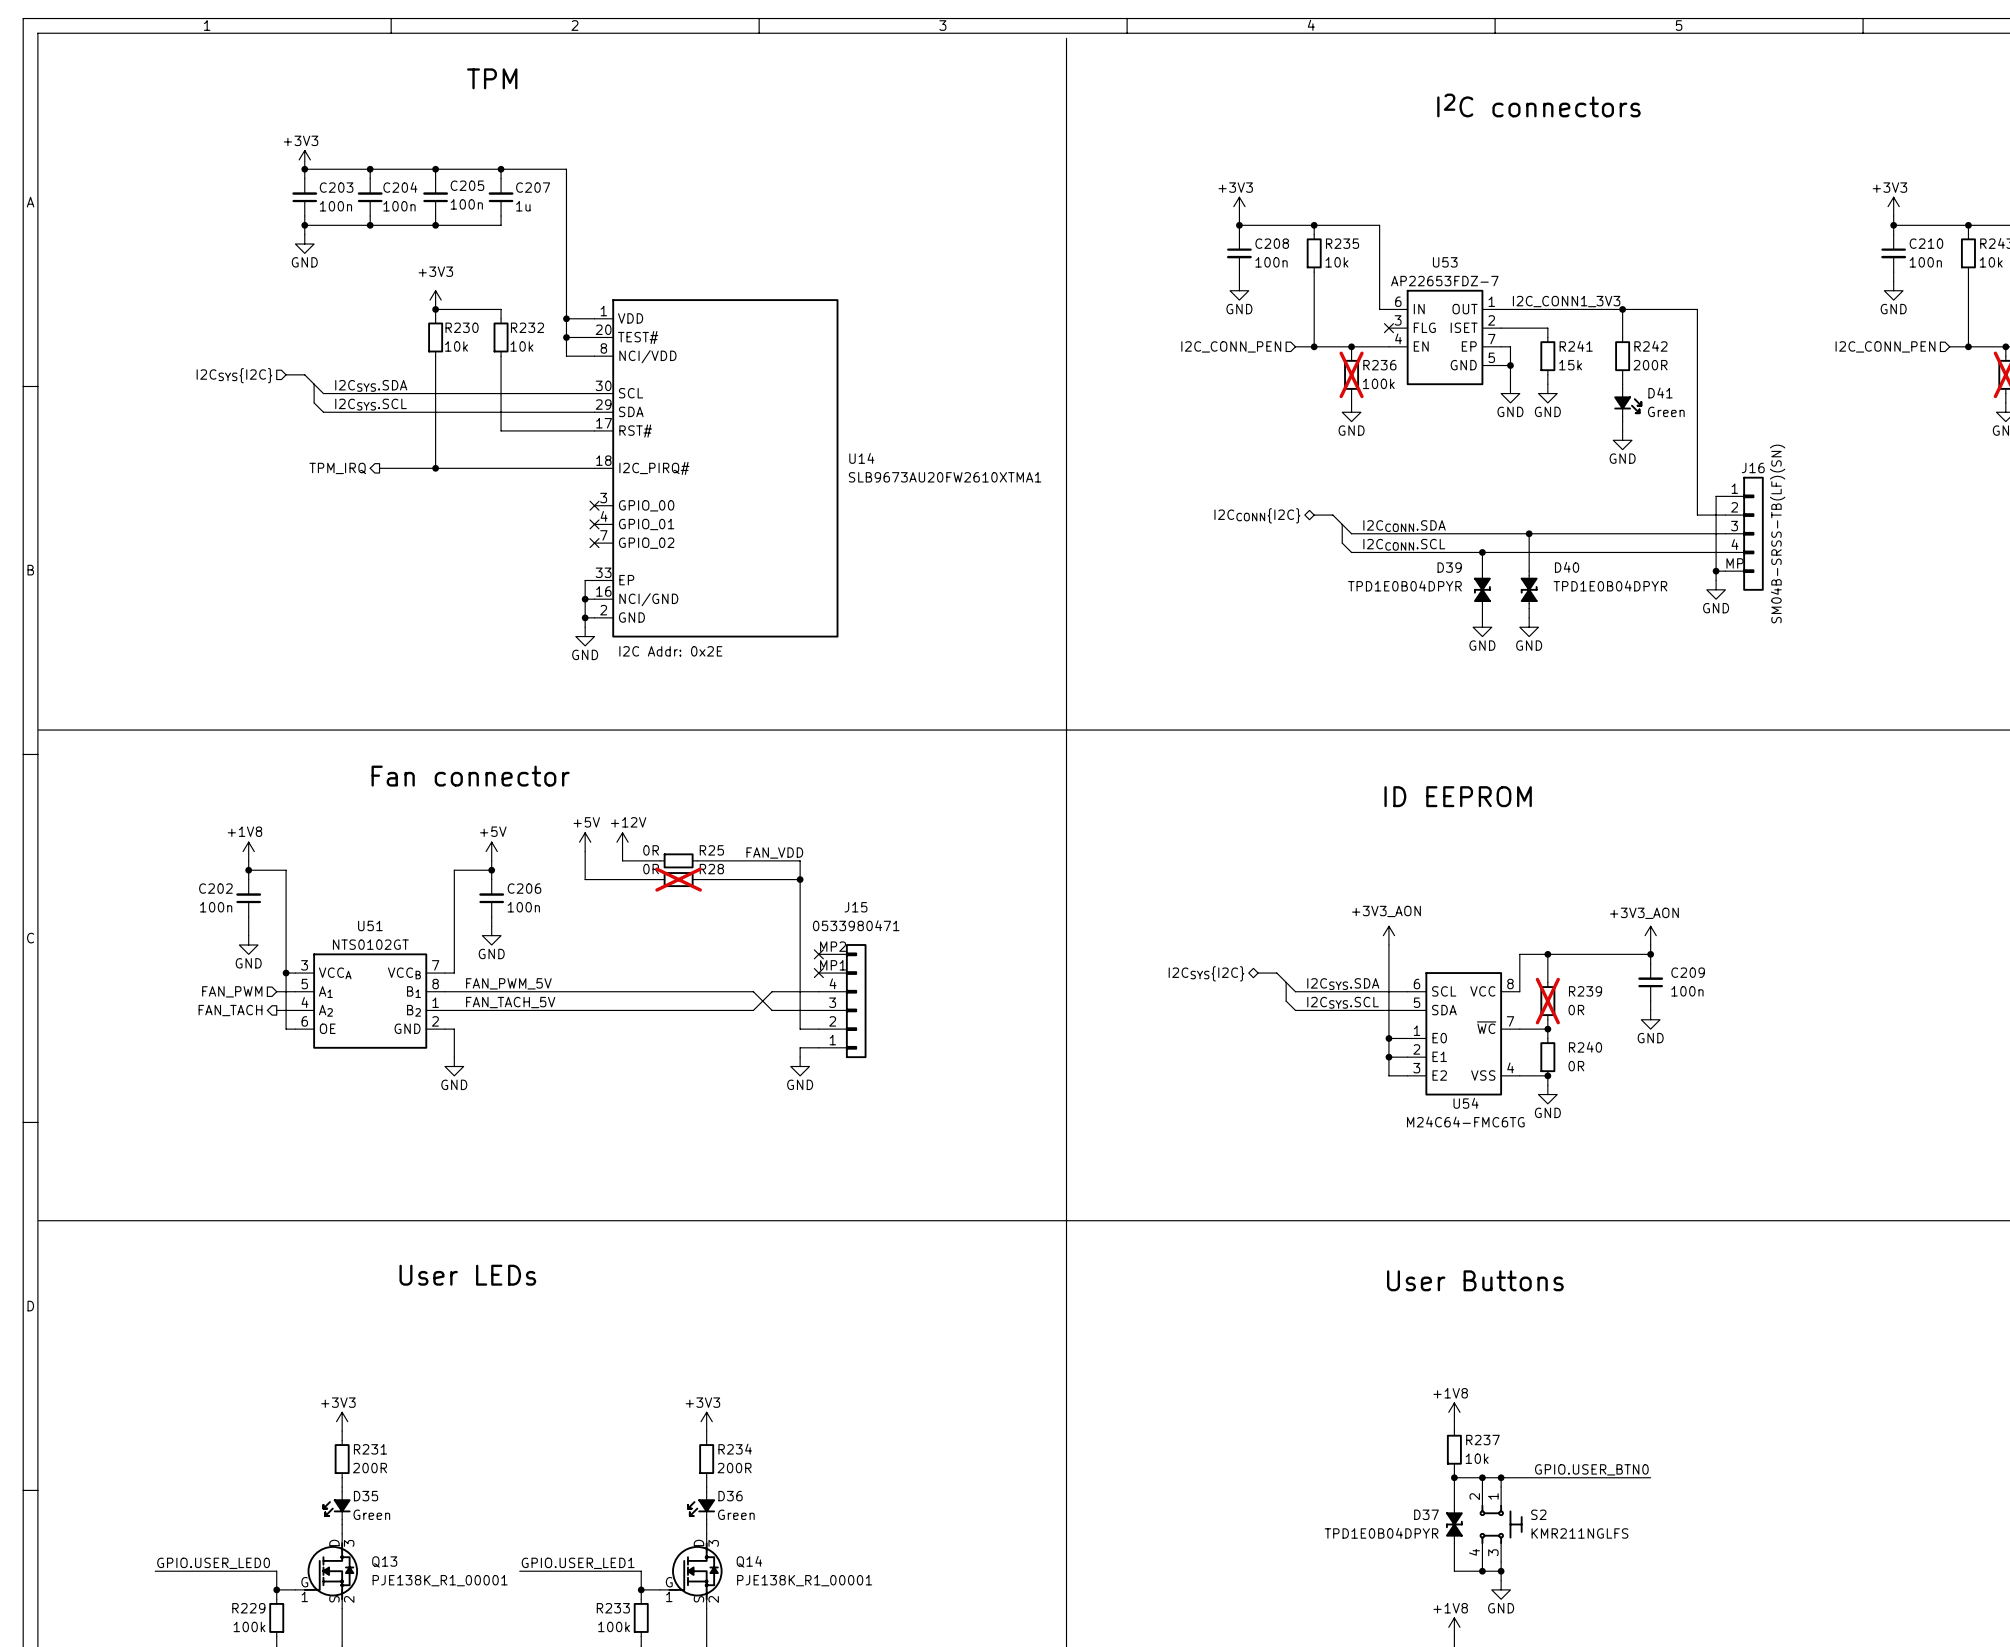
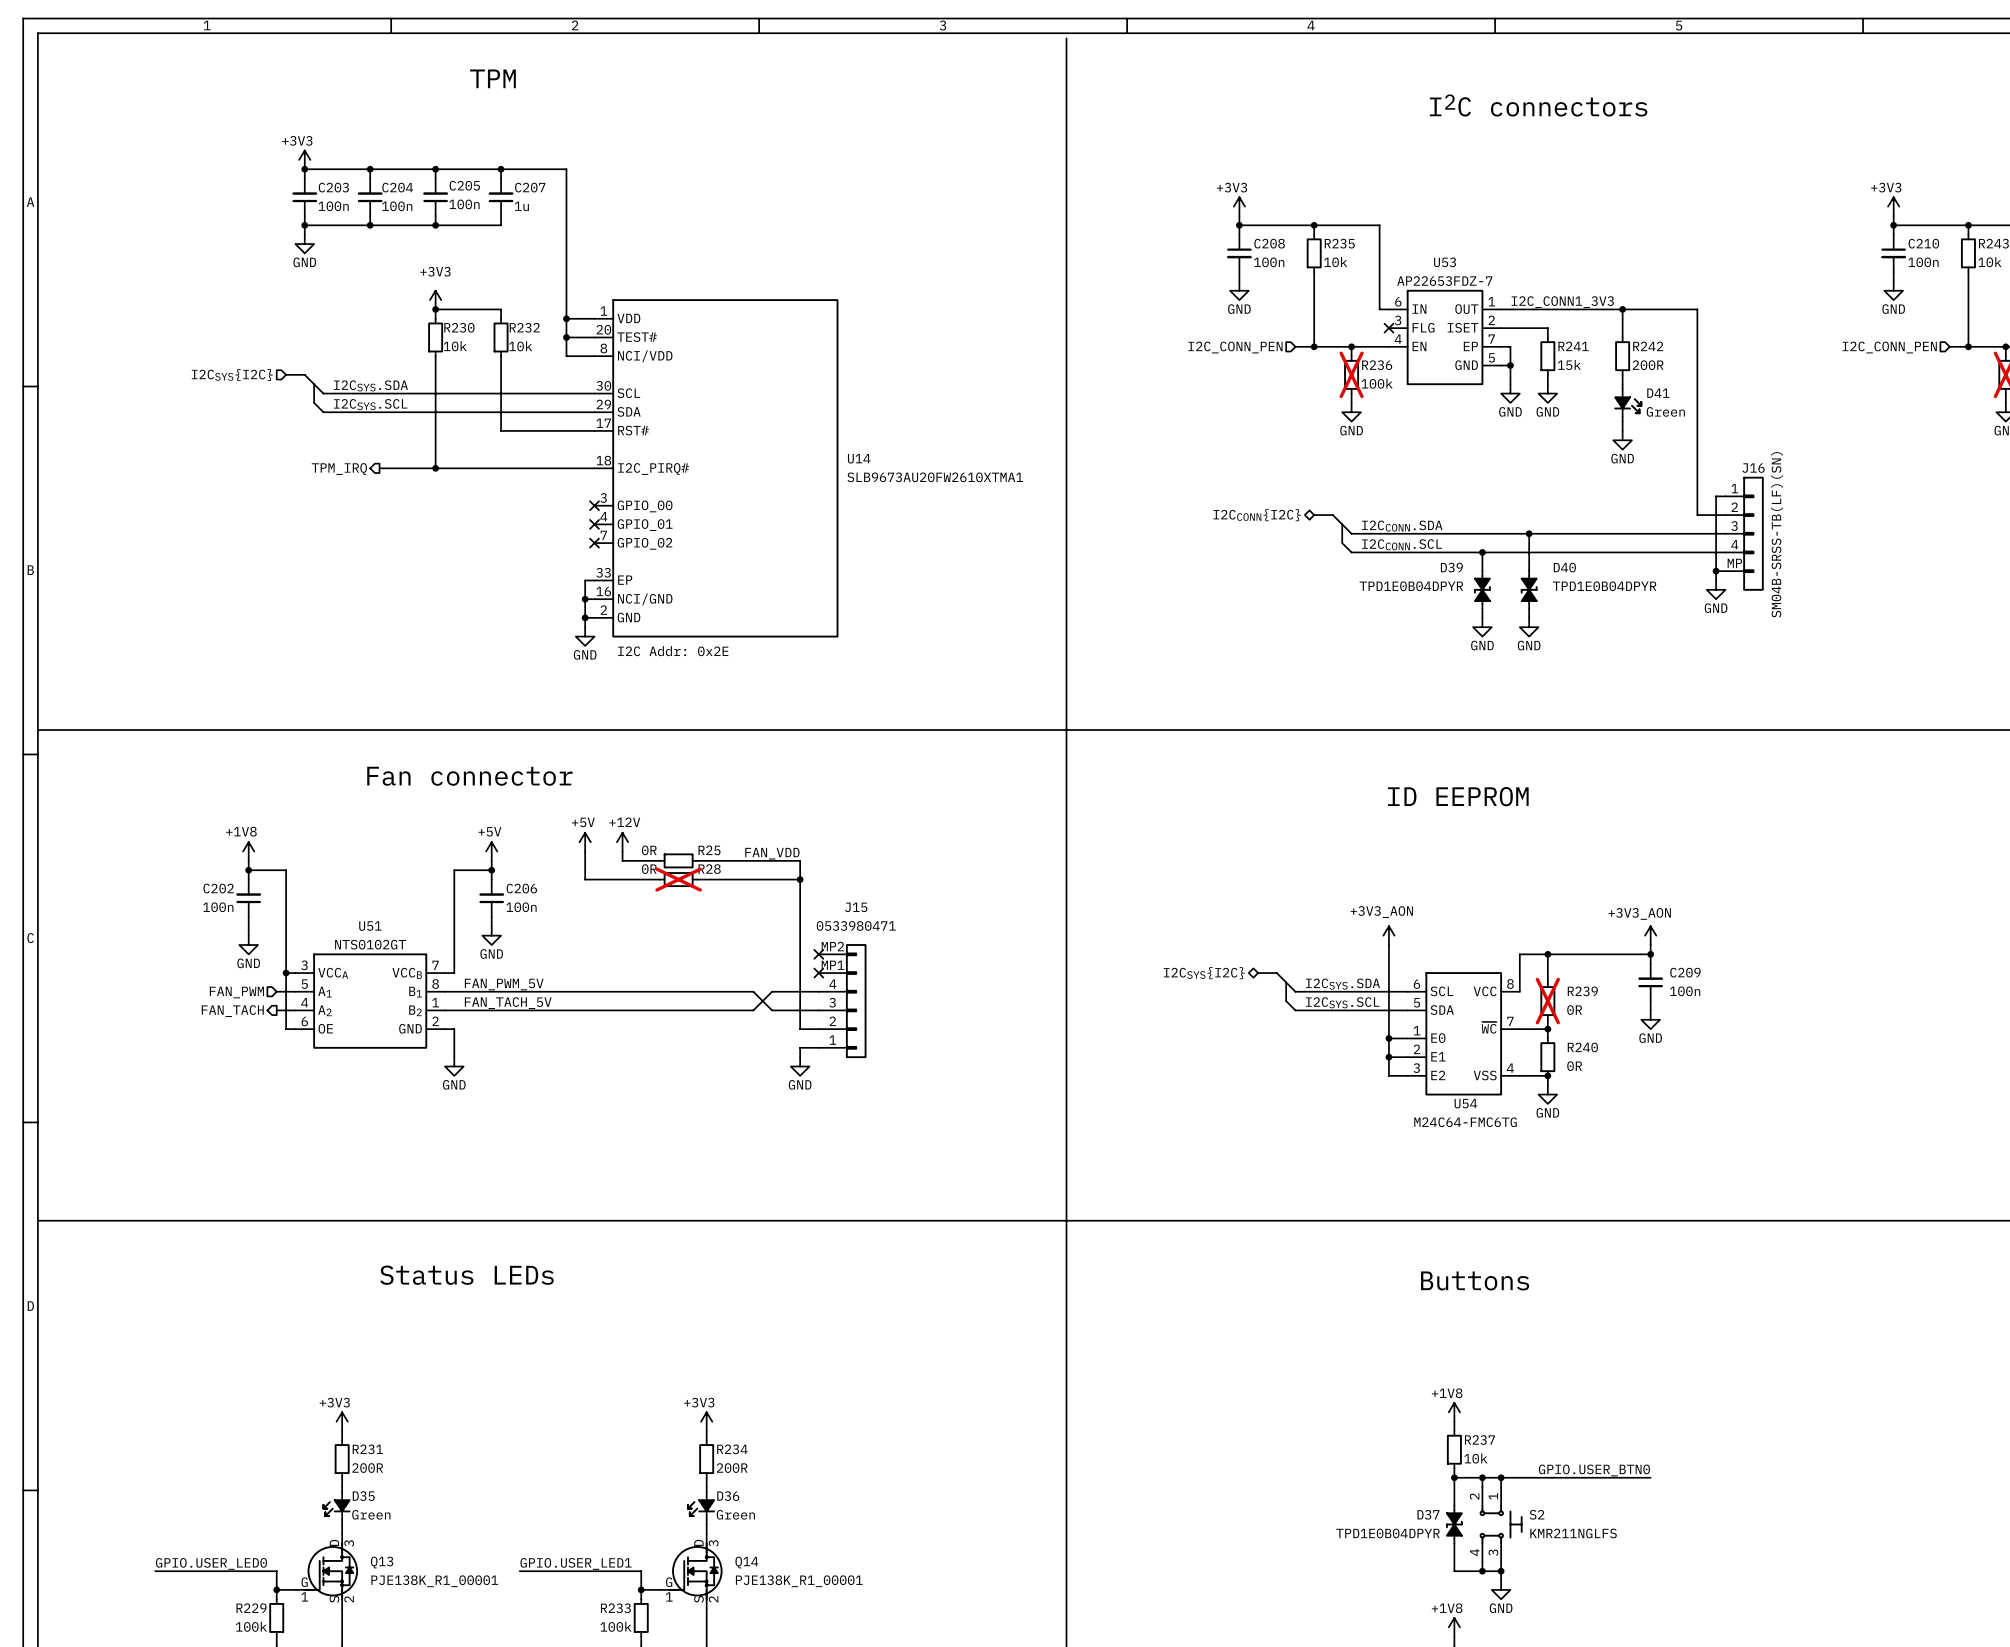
text: User LEDs (467, 1275) -> Status LEDs (466, 1275)
text: User Buttons (1475, 1280) -> Buttons (1475, 1280)

